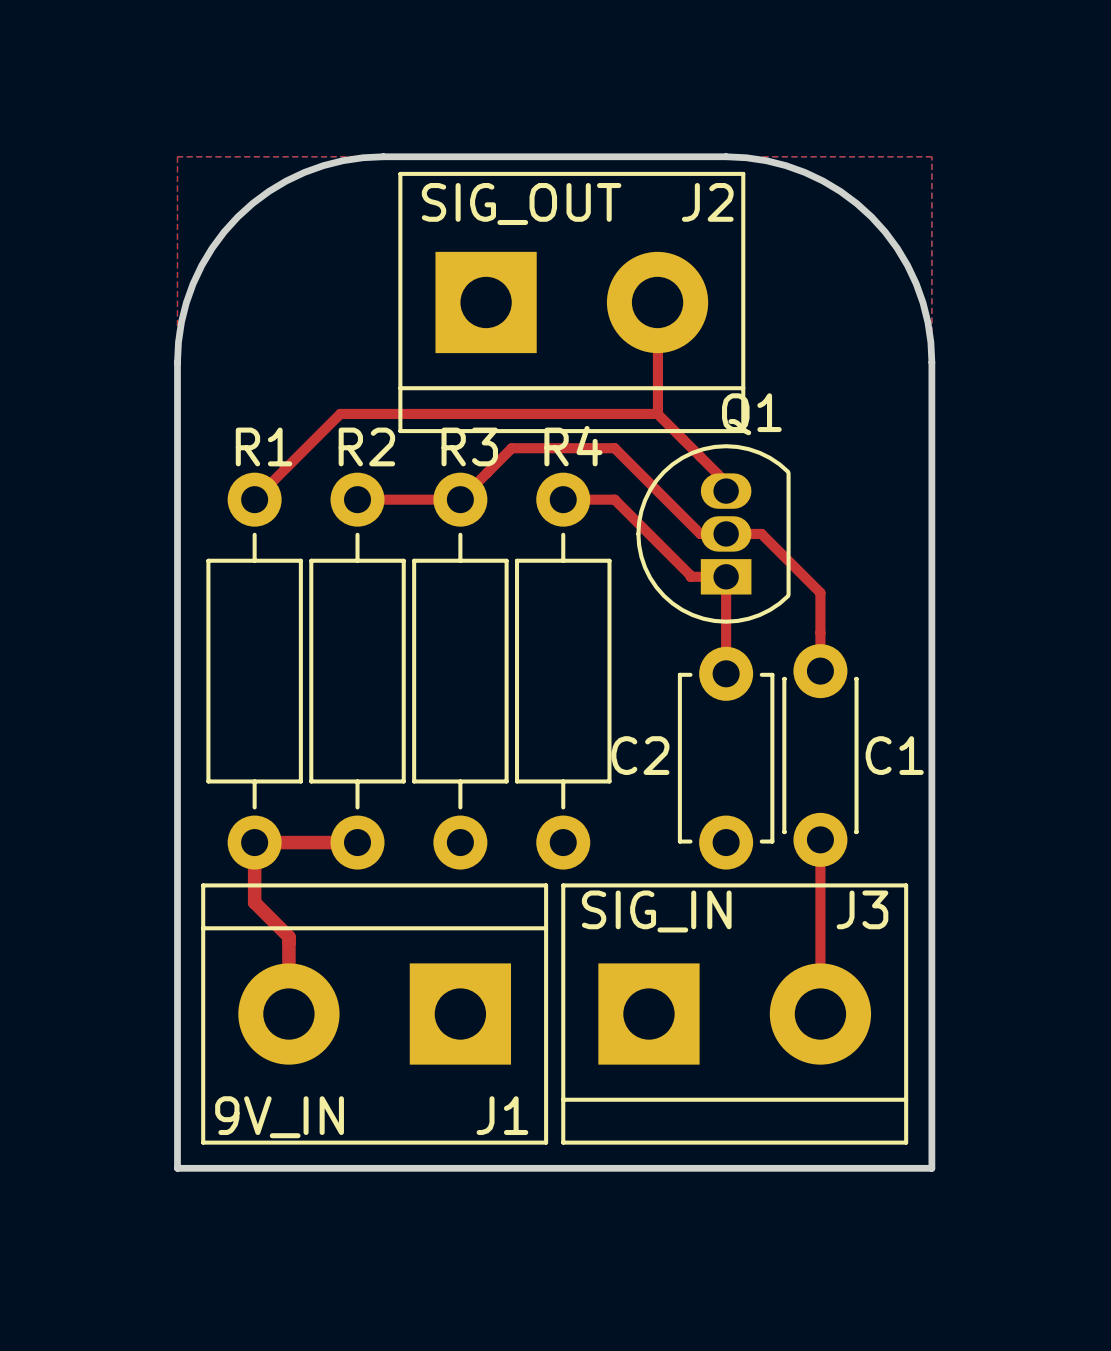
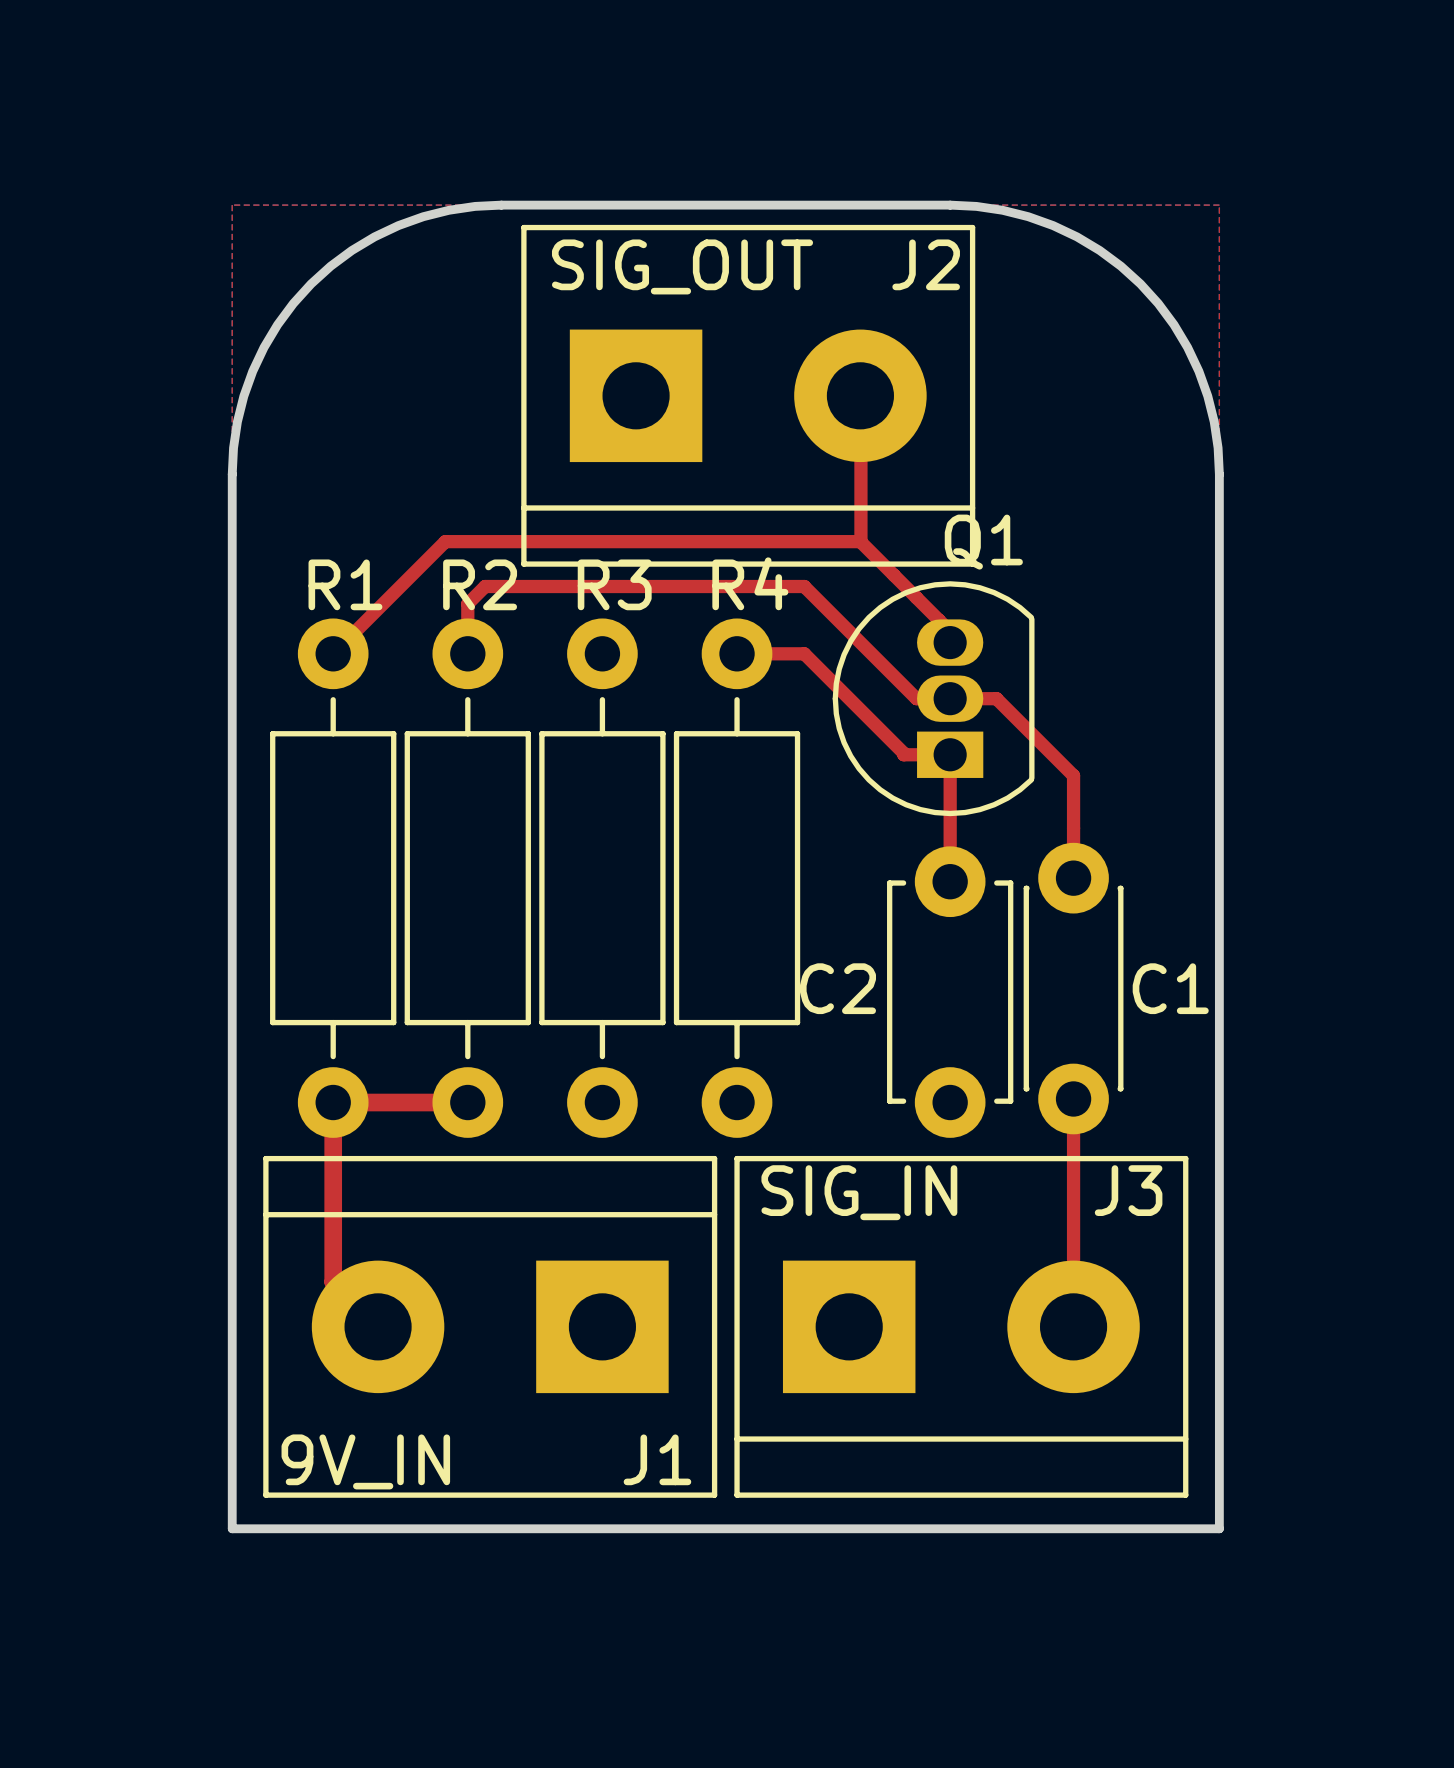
top track: (511, 448) (460, 499) (357, 499) -> (669, 586) (485, 586) (467, 603) (467, 653)
top track: (254, 902) (288, 936) (288, 1014) -> (333, 1181) (333, 1281) (378, 1326)

